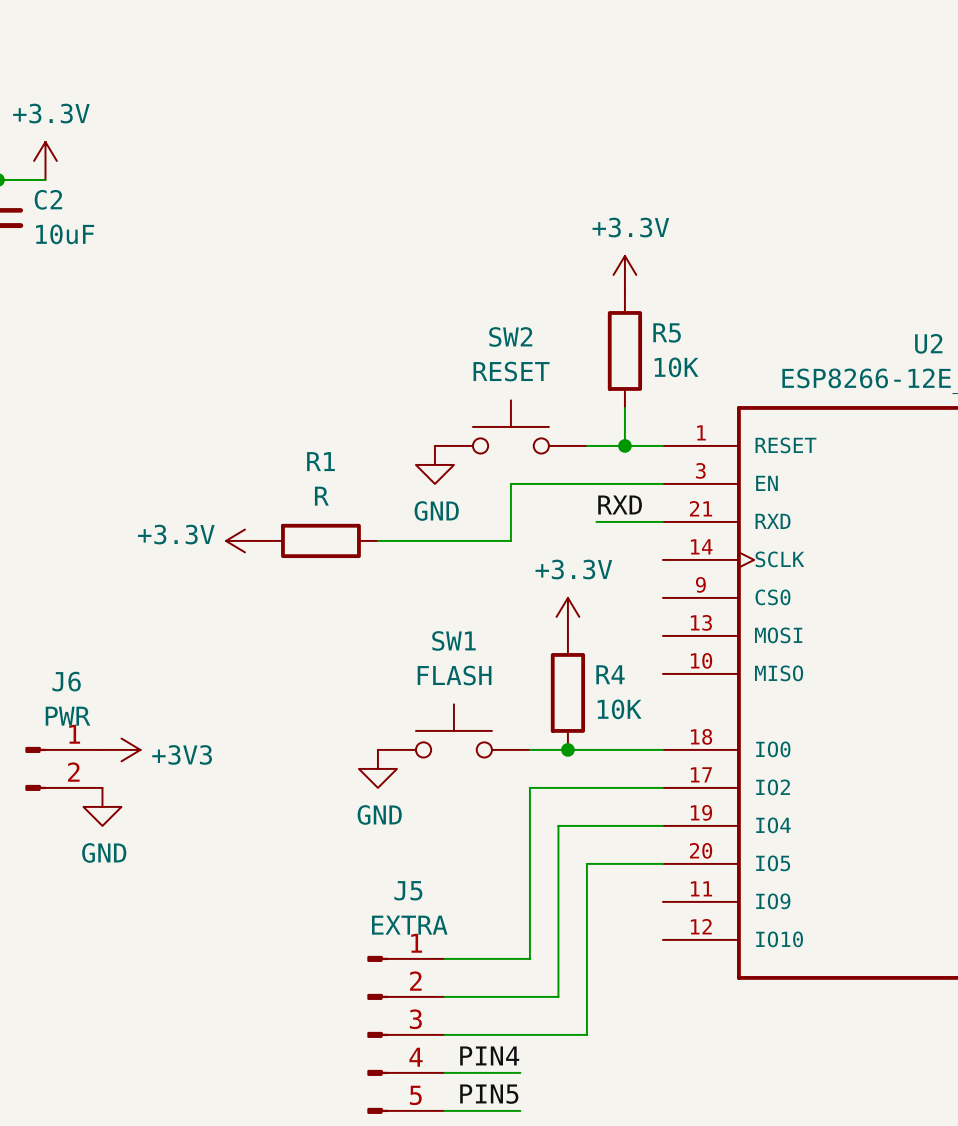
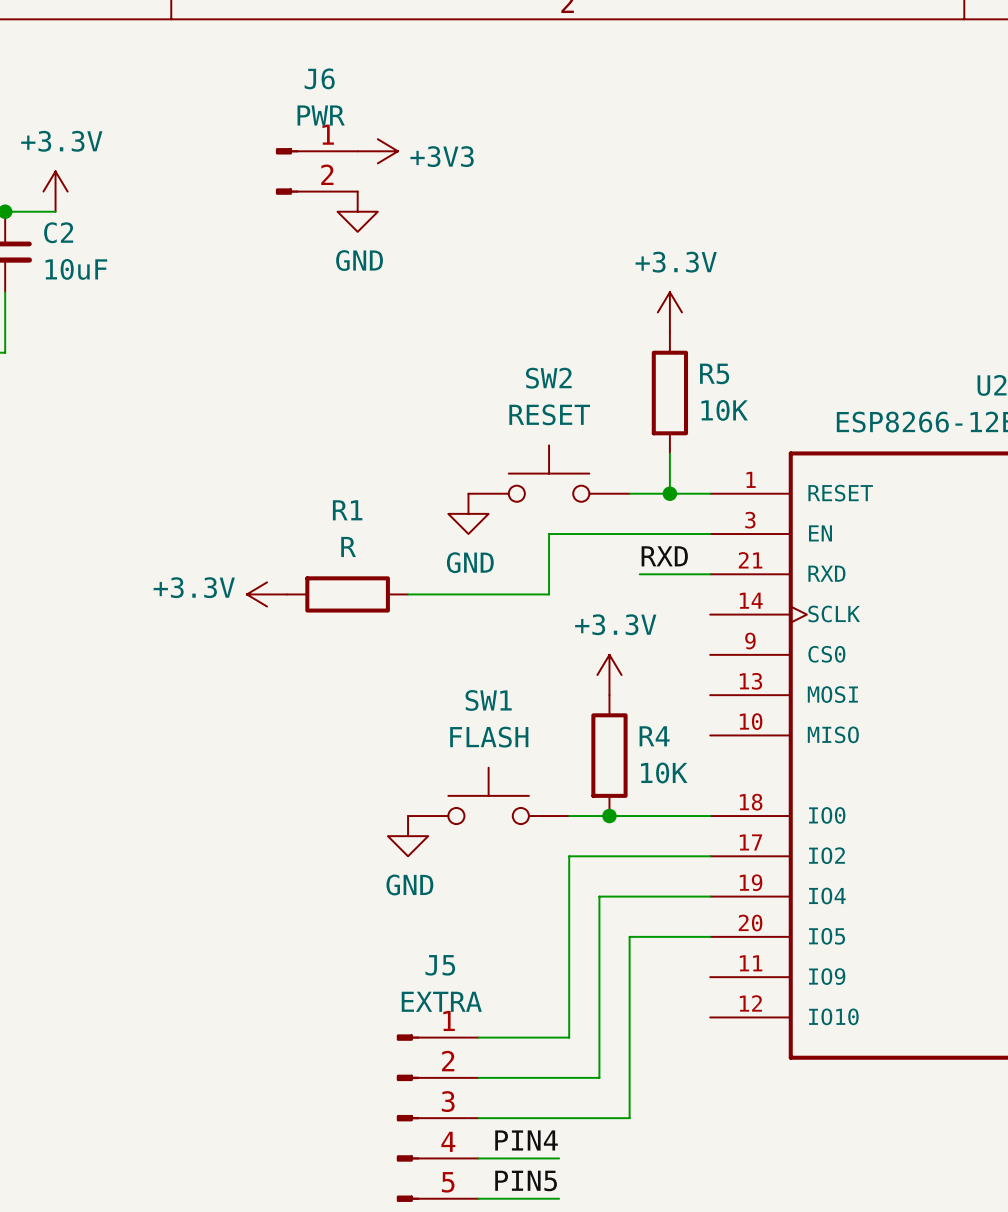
power symbol: none -> +3V3 (377, 151)
power symbol: none -> GND (357, 211)
power symbol: +3V3 (121, 749) -> none
J6 position: (63, 768) -> (316, 171)
power symbol: GND (102, 806) -> none

